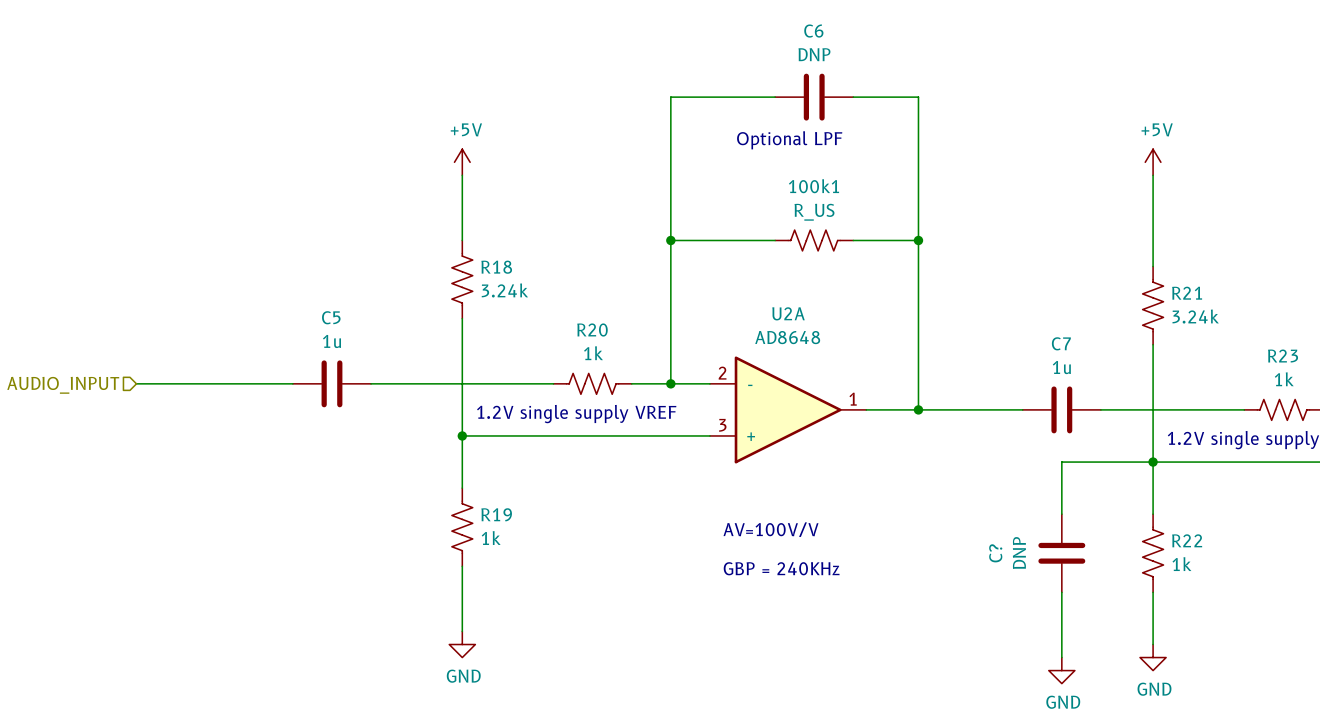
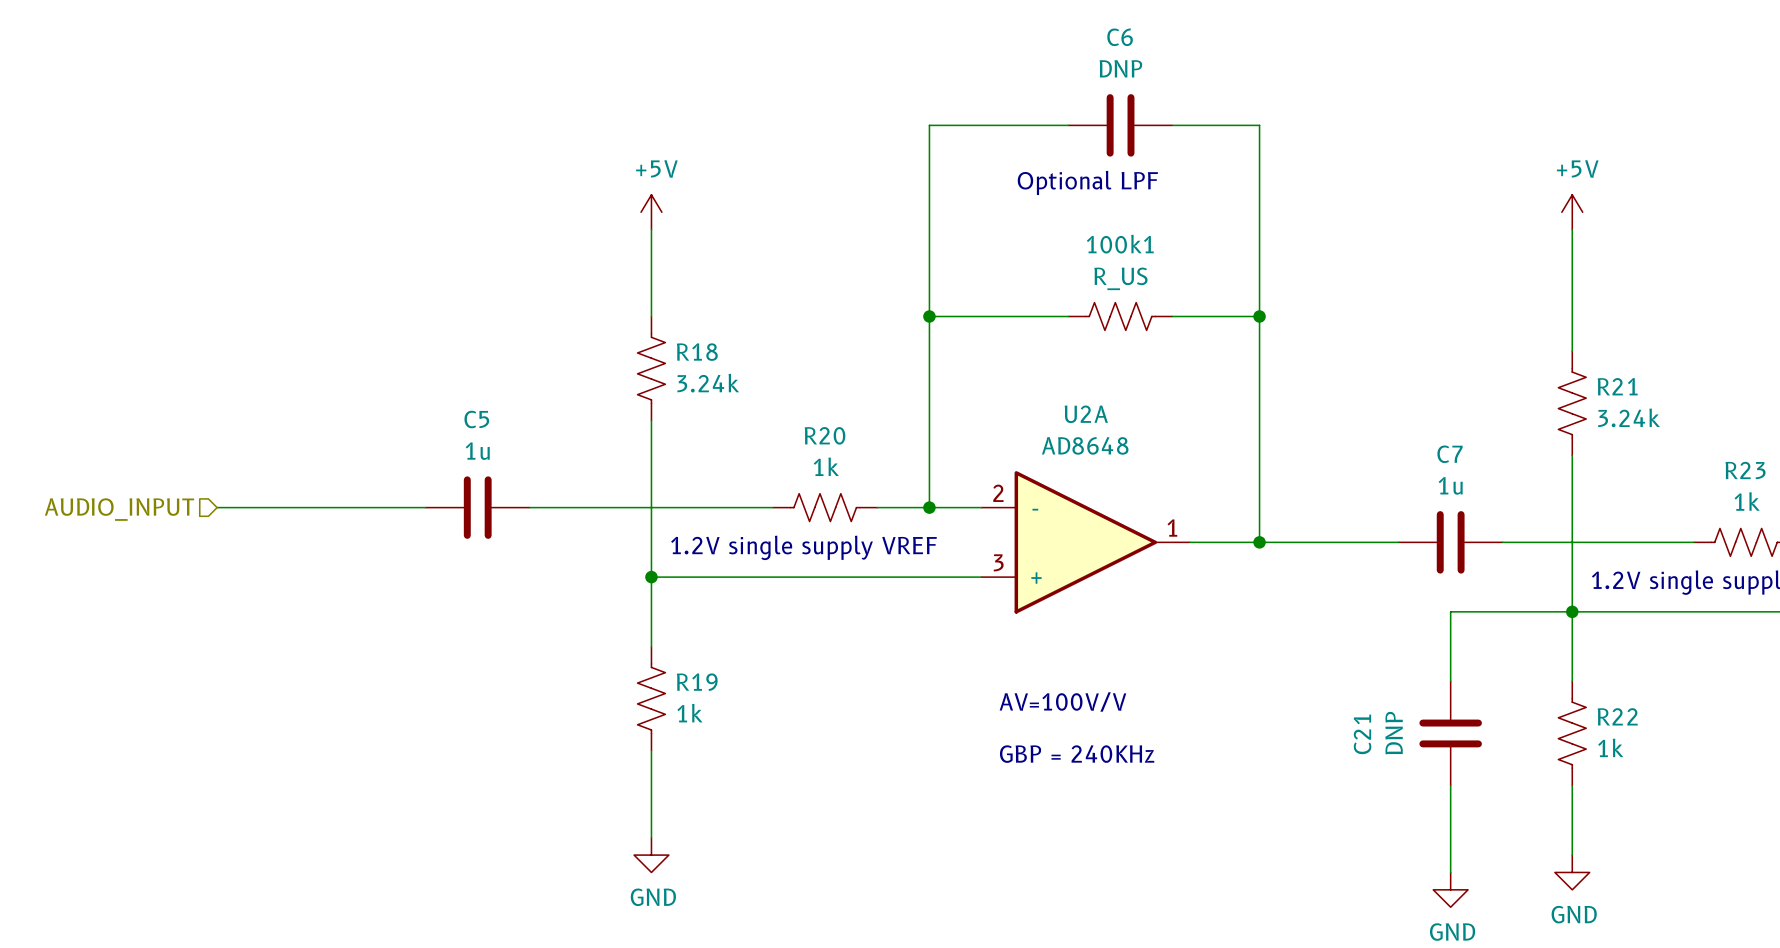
C? name: C? (995, 553) -> C21 (1362, 734)

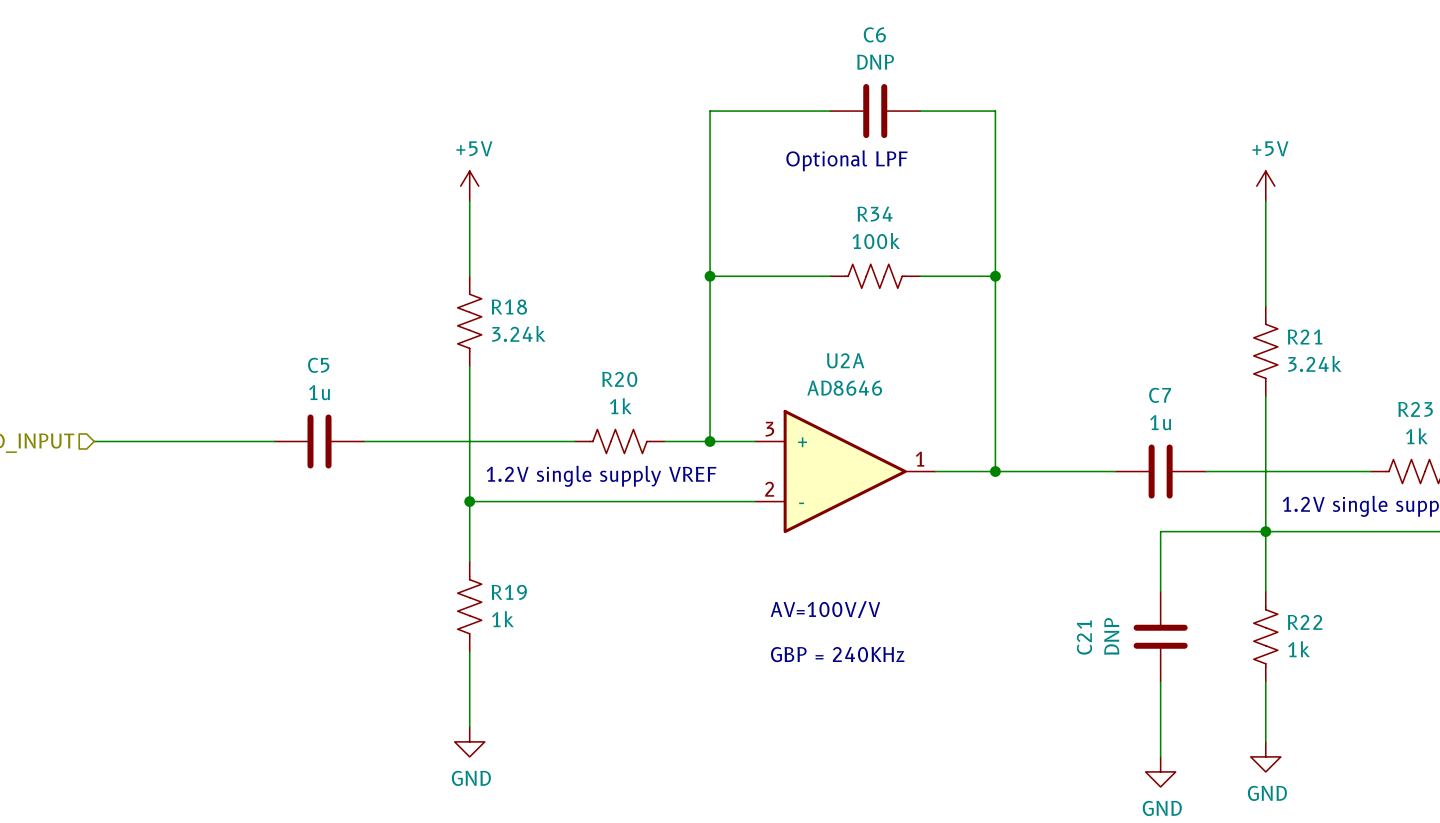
100k1 name: 100k1 (1120, 244) -> R34 (875, 214)
100k1 value: R_US (1120, 278) -> 100k (876, 241)
U2A value: AD8648 (1085, 445) -> AD8646 (844, 388)
U2A flip: as is (1085, 542) -> up-down (845, 471)

